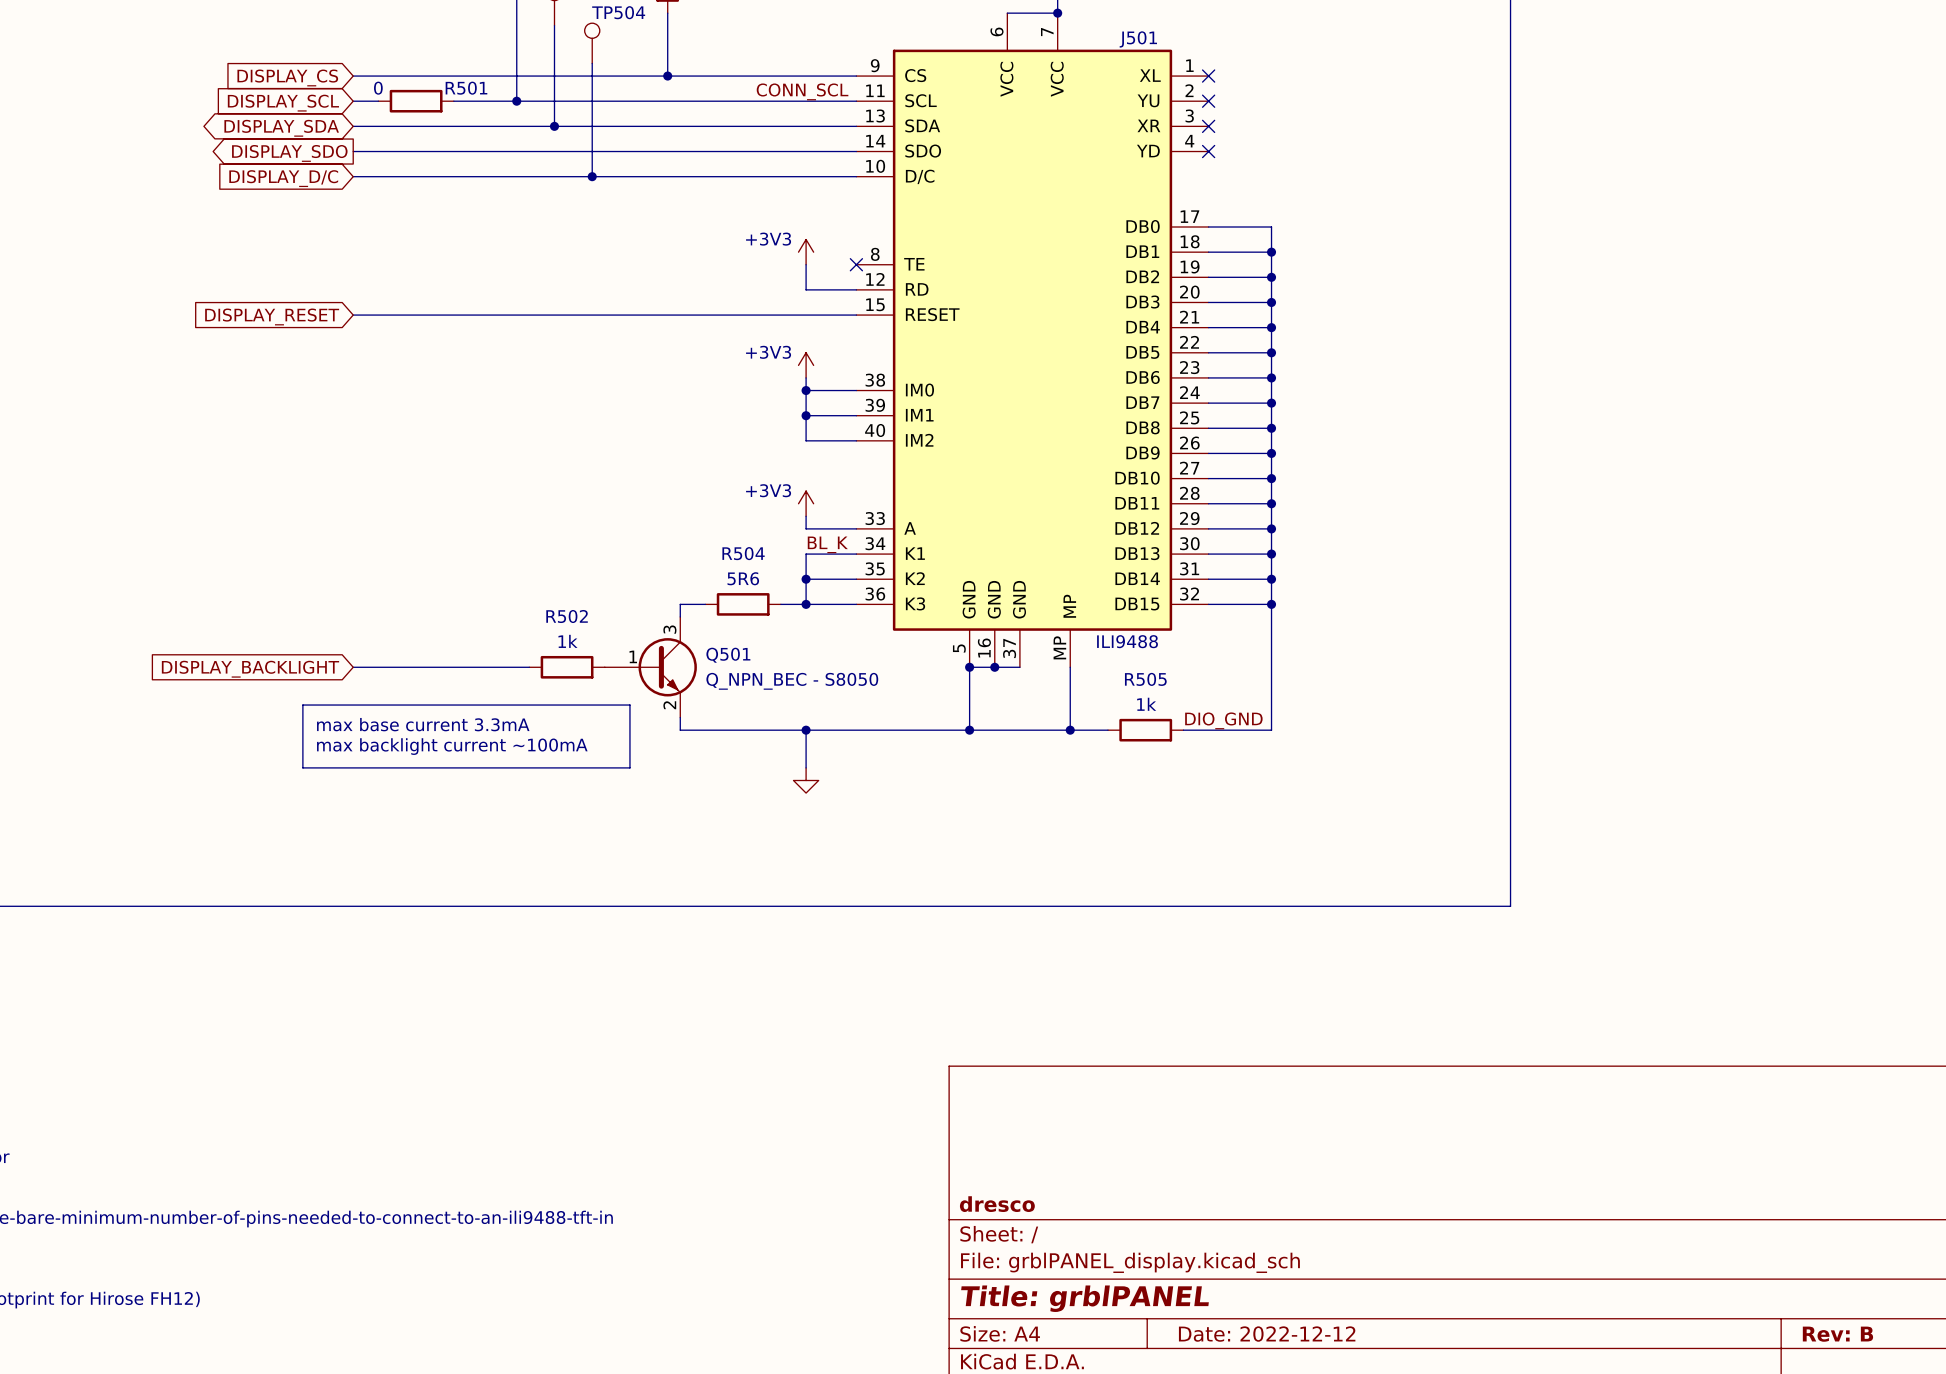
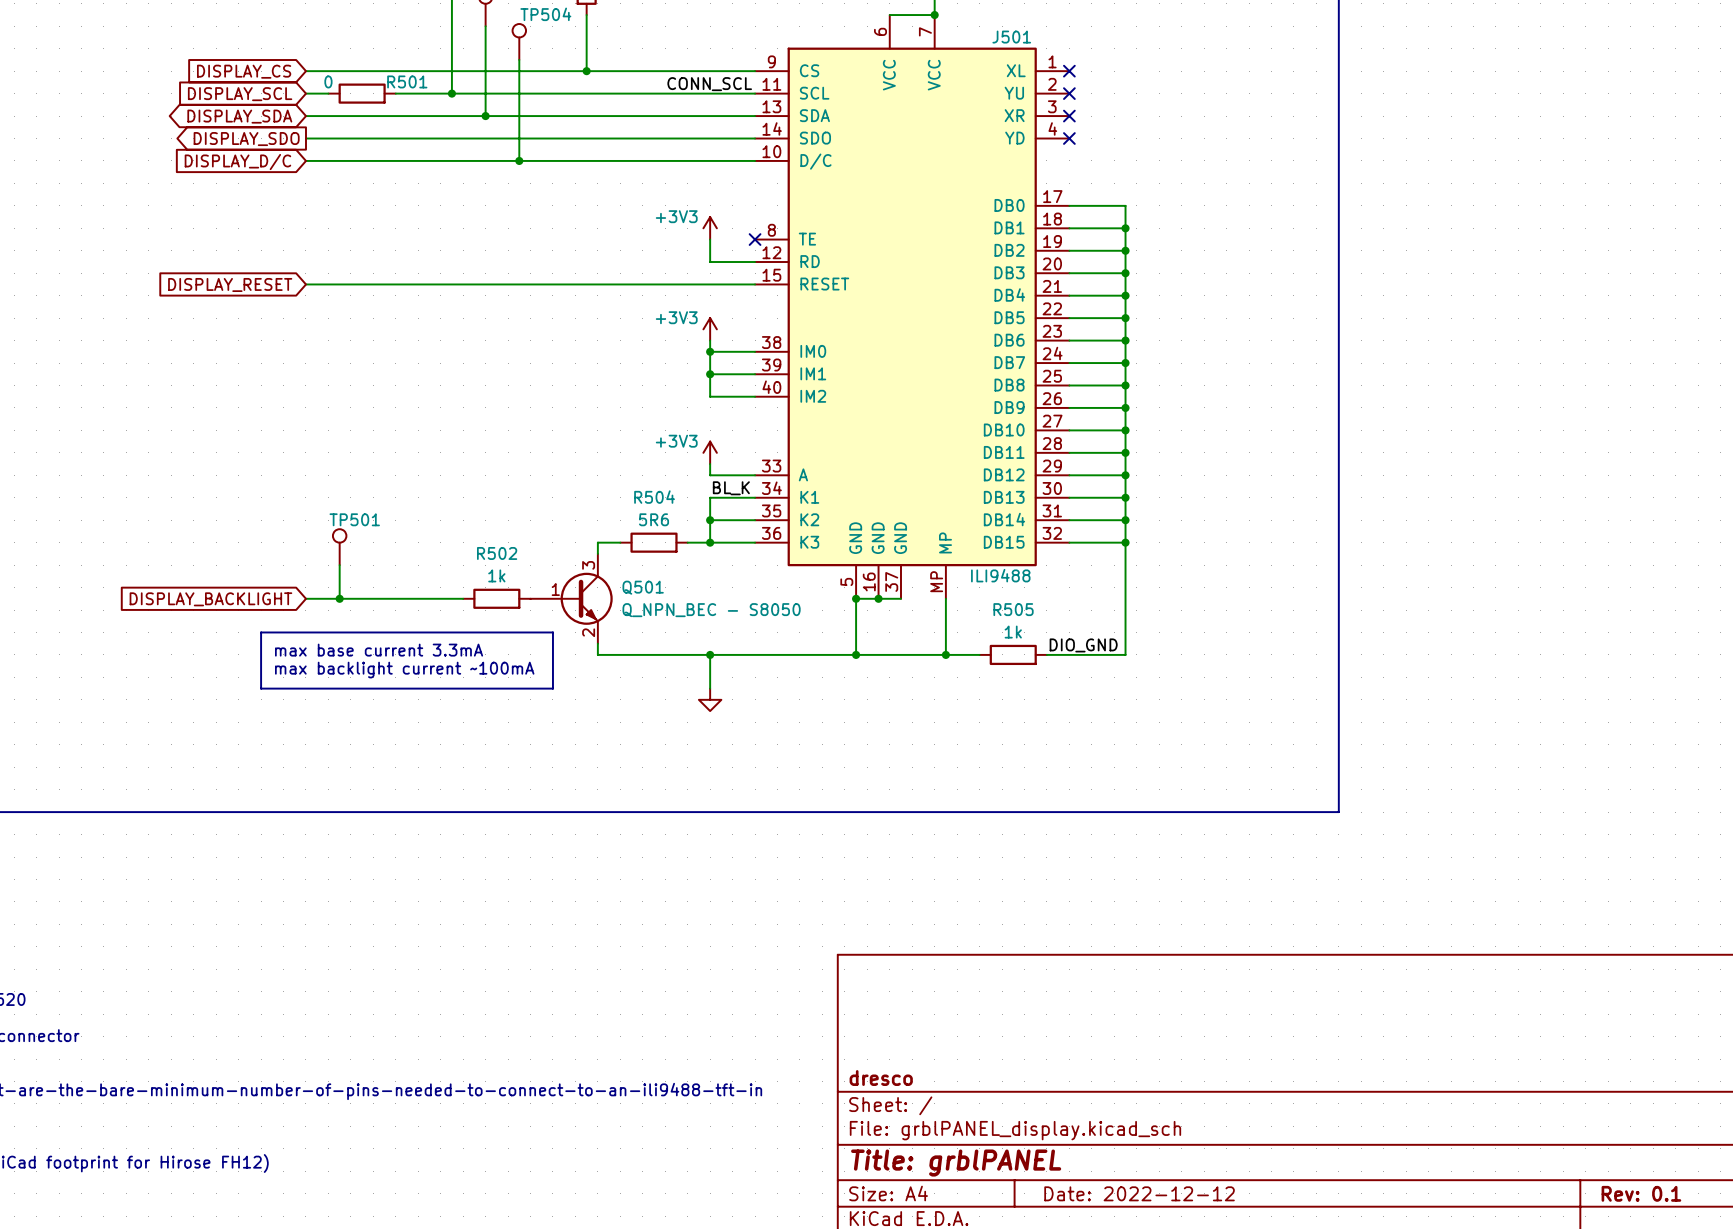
TP501: none -> (339, 547)
wire: none -> (339, 565) (339, 598)
junction: none -> (339, 598)
title block: Rev: B (1837, 1334) -> Rev: 0.1 (1641, 1193)

